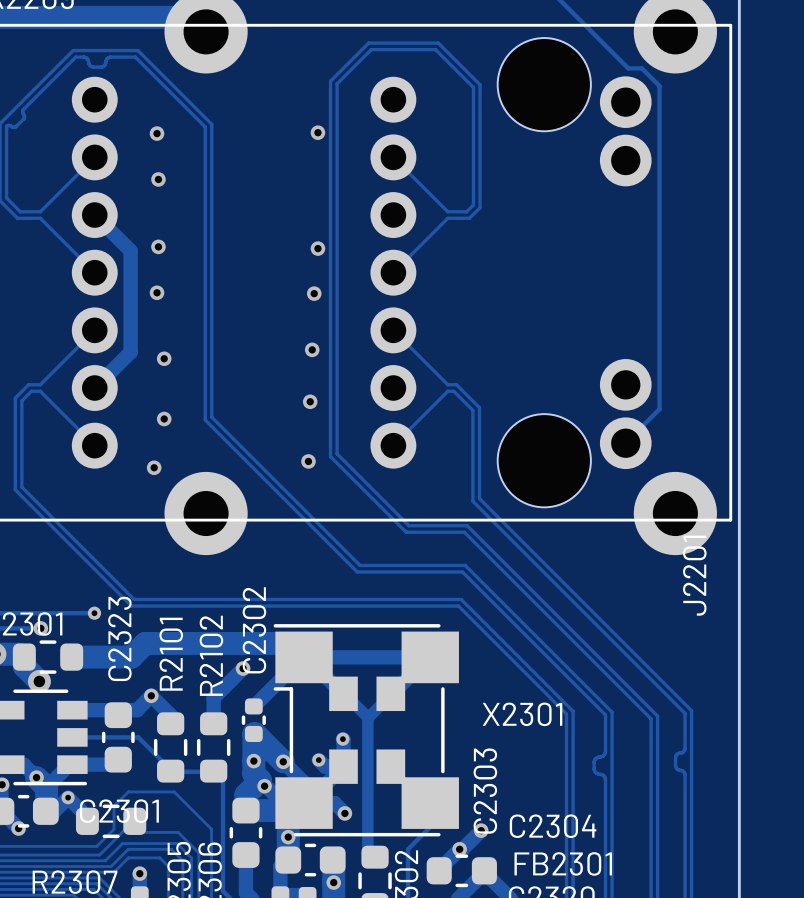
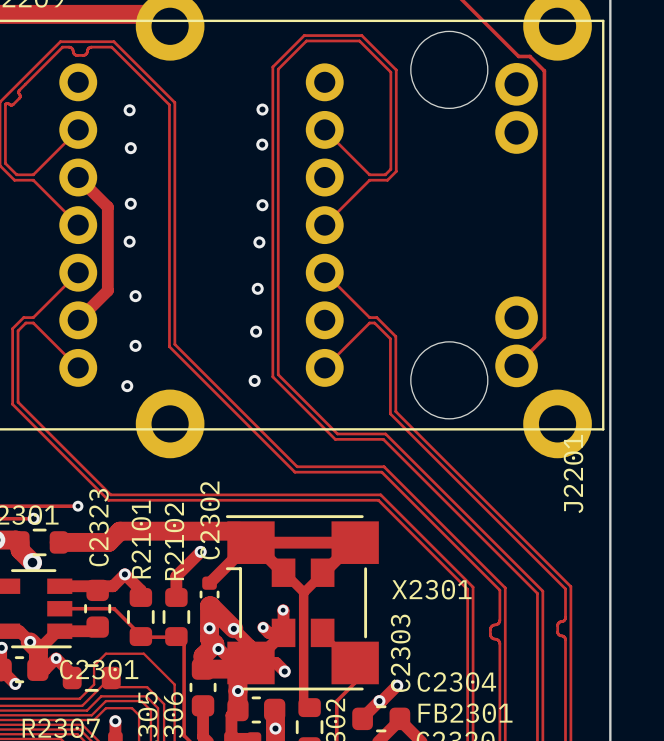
via: none -> (262, 144)

